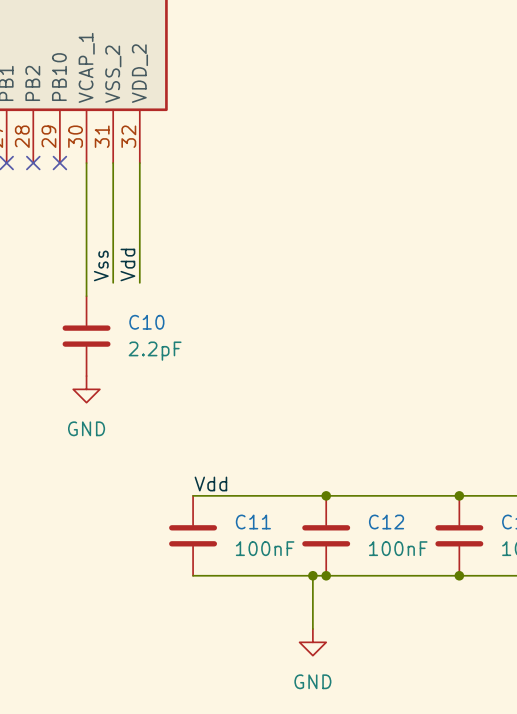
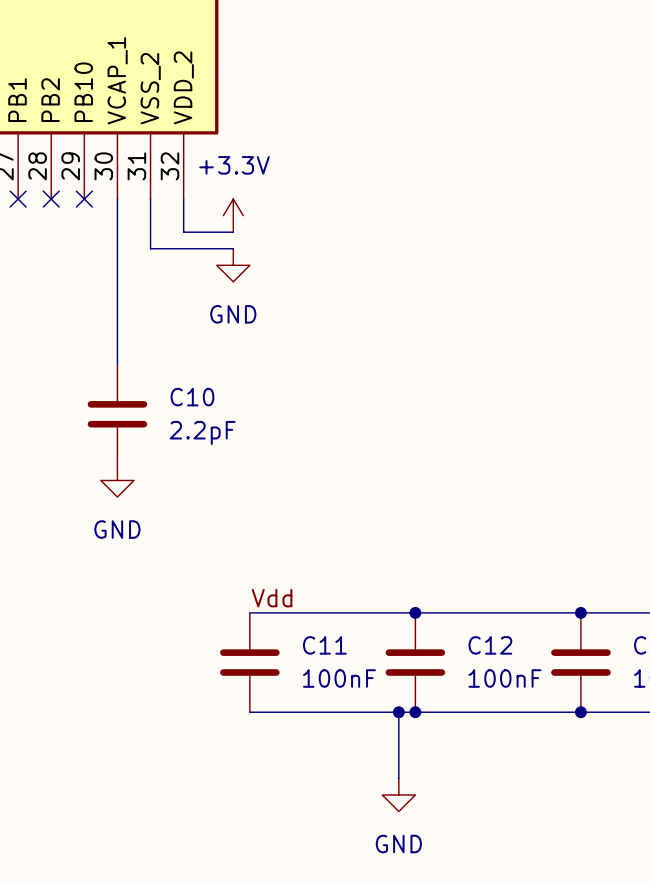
power symbol: none -> +3.3V (233, 215)
wire: (139, 189) (139, 282) -> (183, 232) (233, 232)
wire: (113, 202) (113, 282) -> (150, 248) (233, 248)
power symbol: none -> GND (233, 265)
label: Vdd (127, 264) -> none
label: Vss (101, 265) -> none

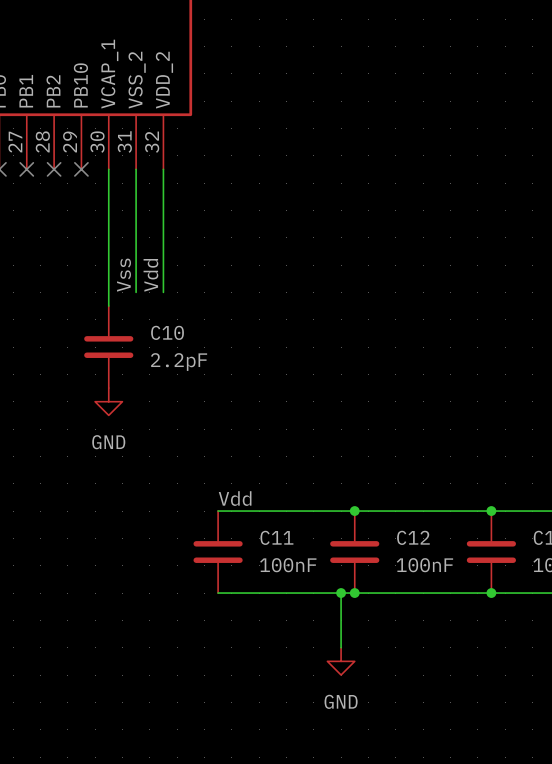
power symbol: +3.3V (233, 215) -> none
wire: (183, 232) (233, 232) -> (163, 196) (163, 292)
wire: (150, 248) (233, 248) -> (136, 210) (136, 292)
power symbol: GND (233, 265) -> none
label: none -> Vdd (150, 275)
label: none -> Vss (124, 275)

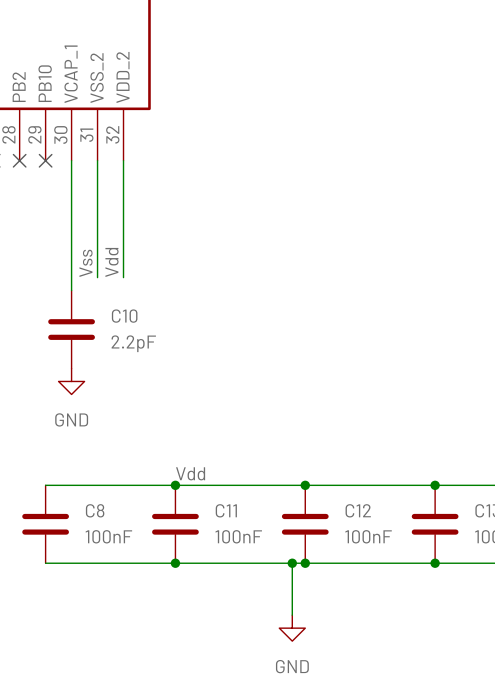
wire: none -> (45, 485) (175, 485)
junction: none -> (175, 485)
C8: none -> 100nF (45, 524)
wire: none -> (45, 563) (175, 563)
junction: none -> (175, 563)

